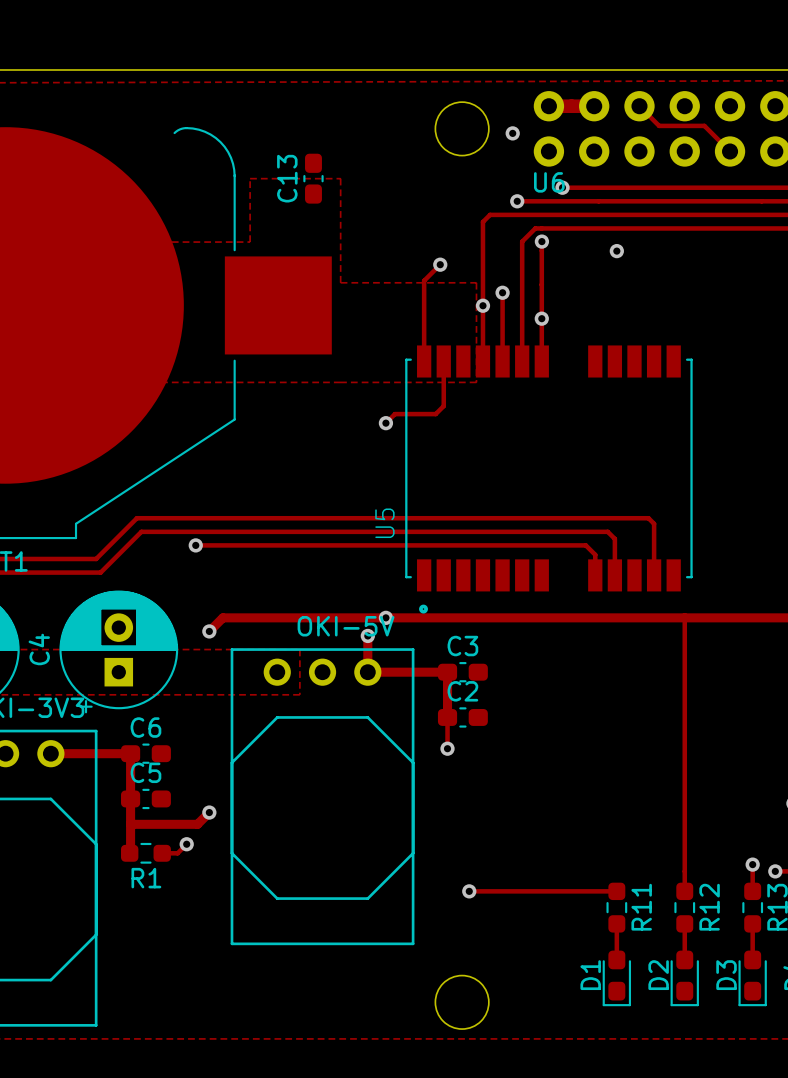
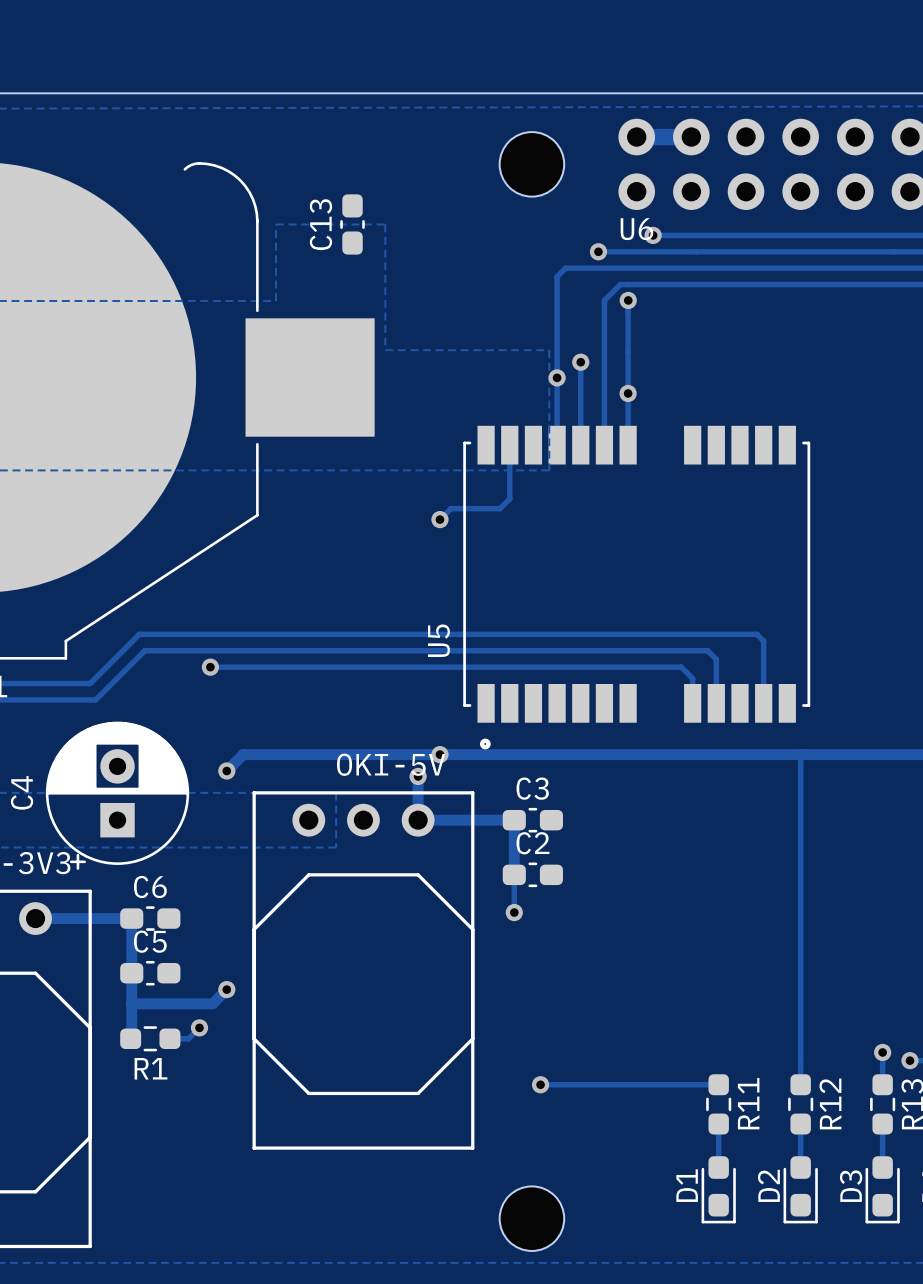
track: (639, 106) (659, 125) (704, 125) (730, 151) -> none
via: (512, 133) -> none
via: (616, 251) -> none
track: (440, 264) (424, 280) (424, 361) -> none
via: (440, 264) -> none

